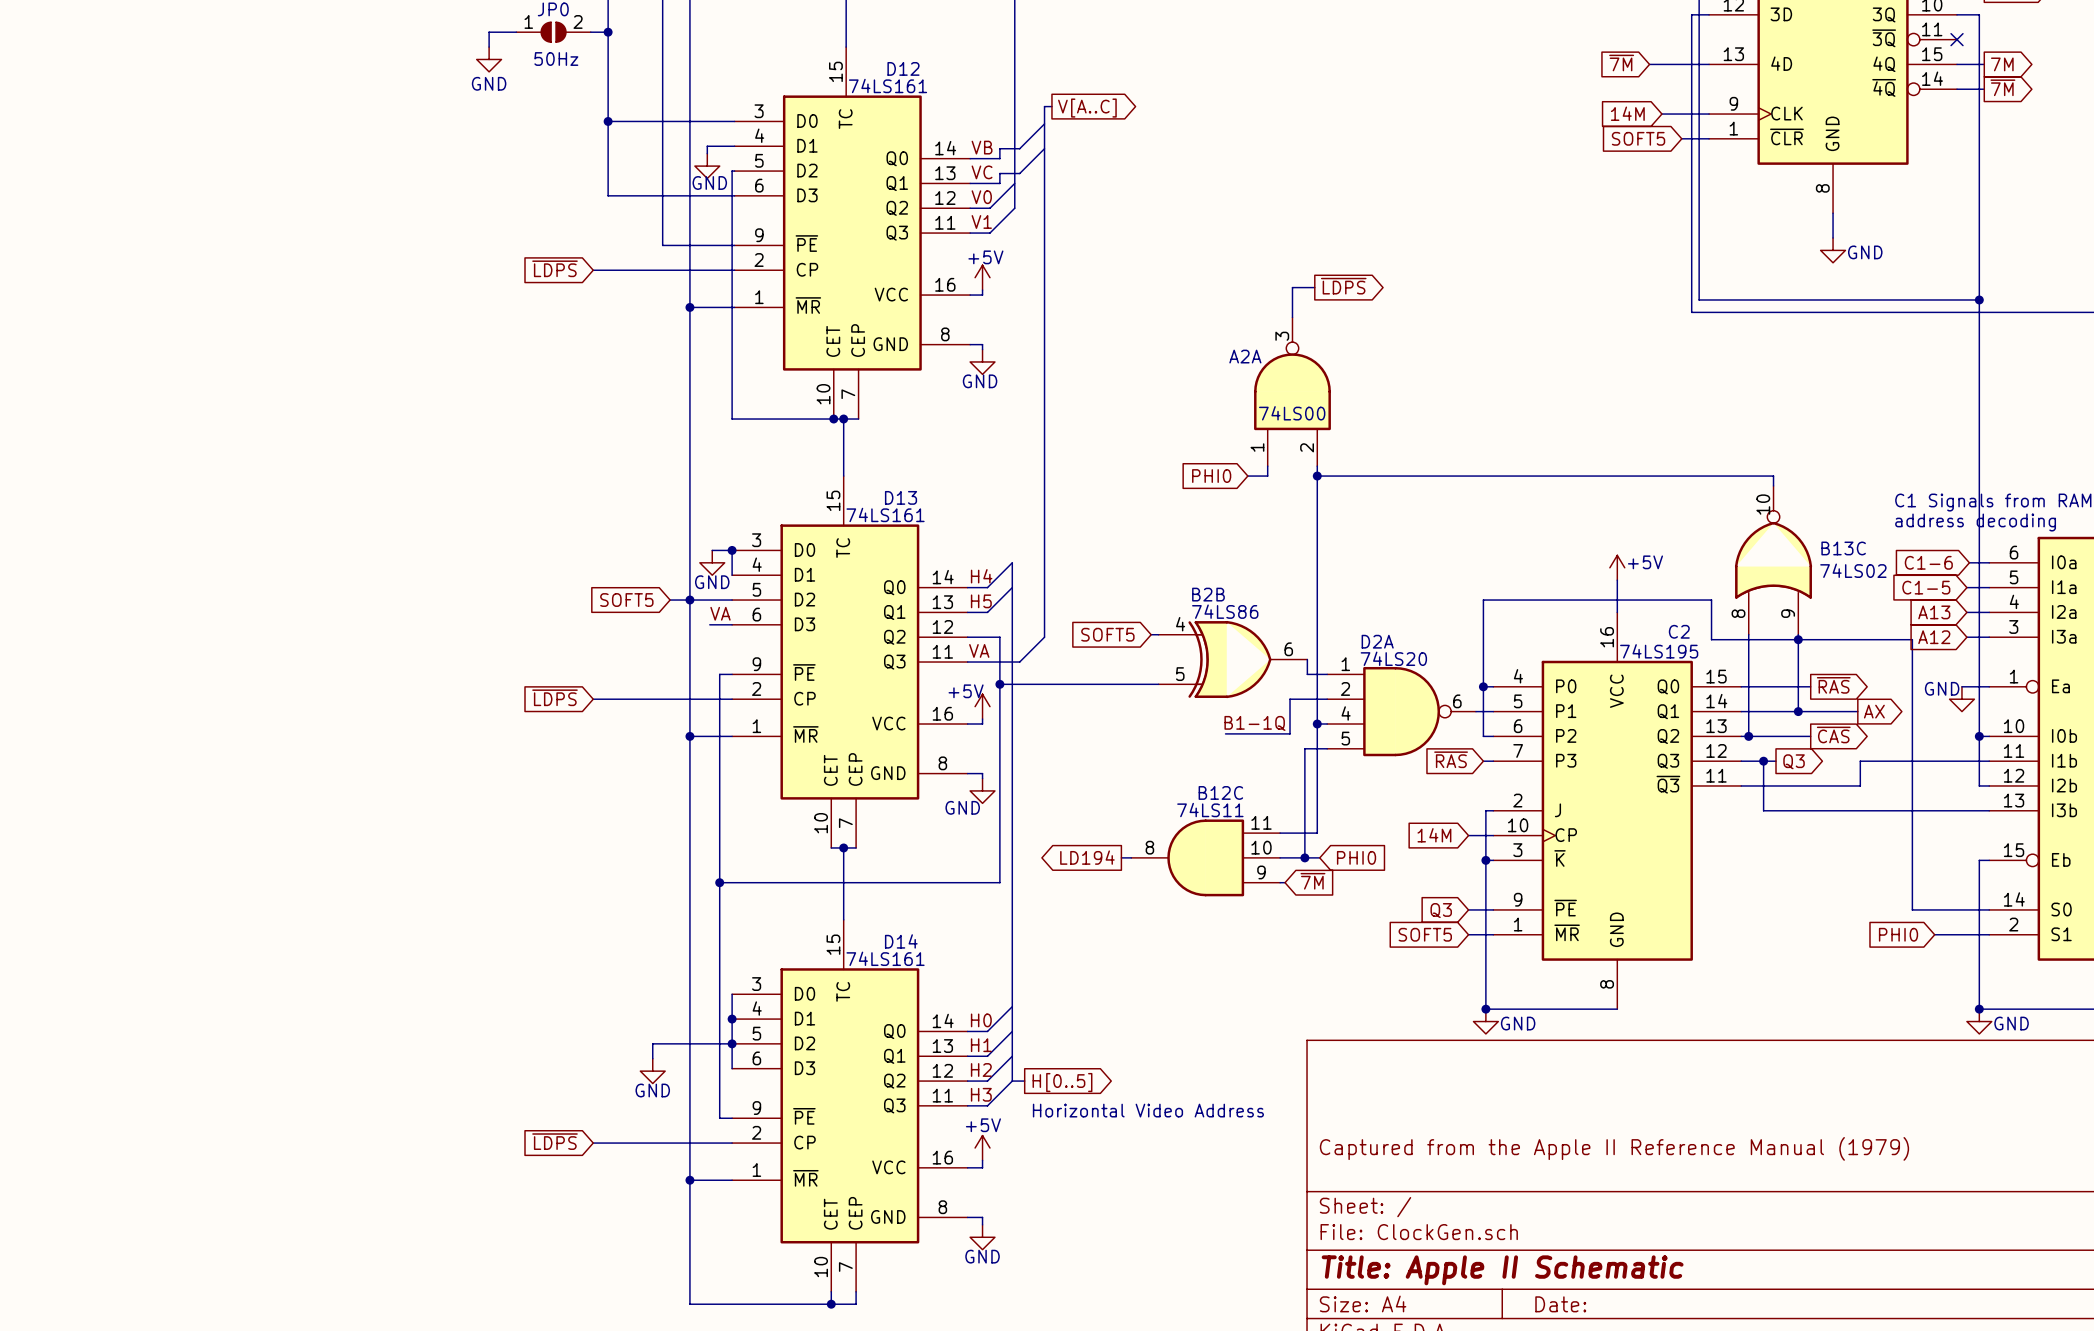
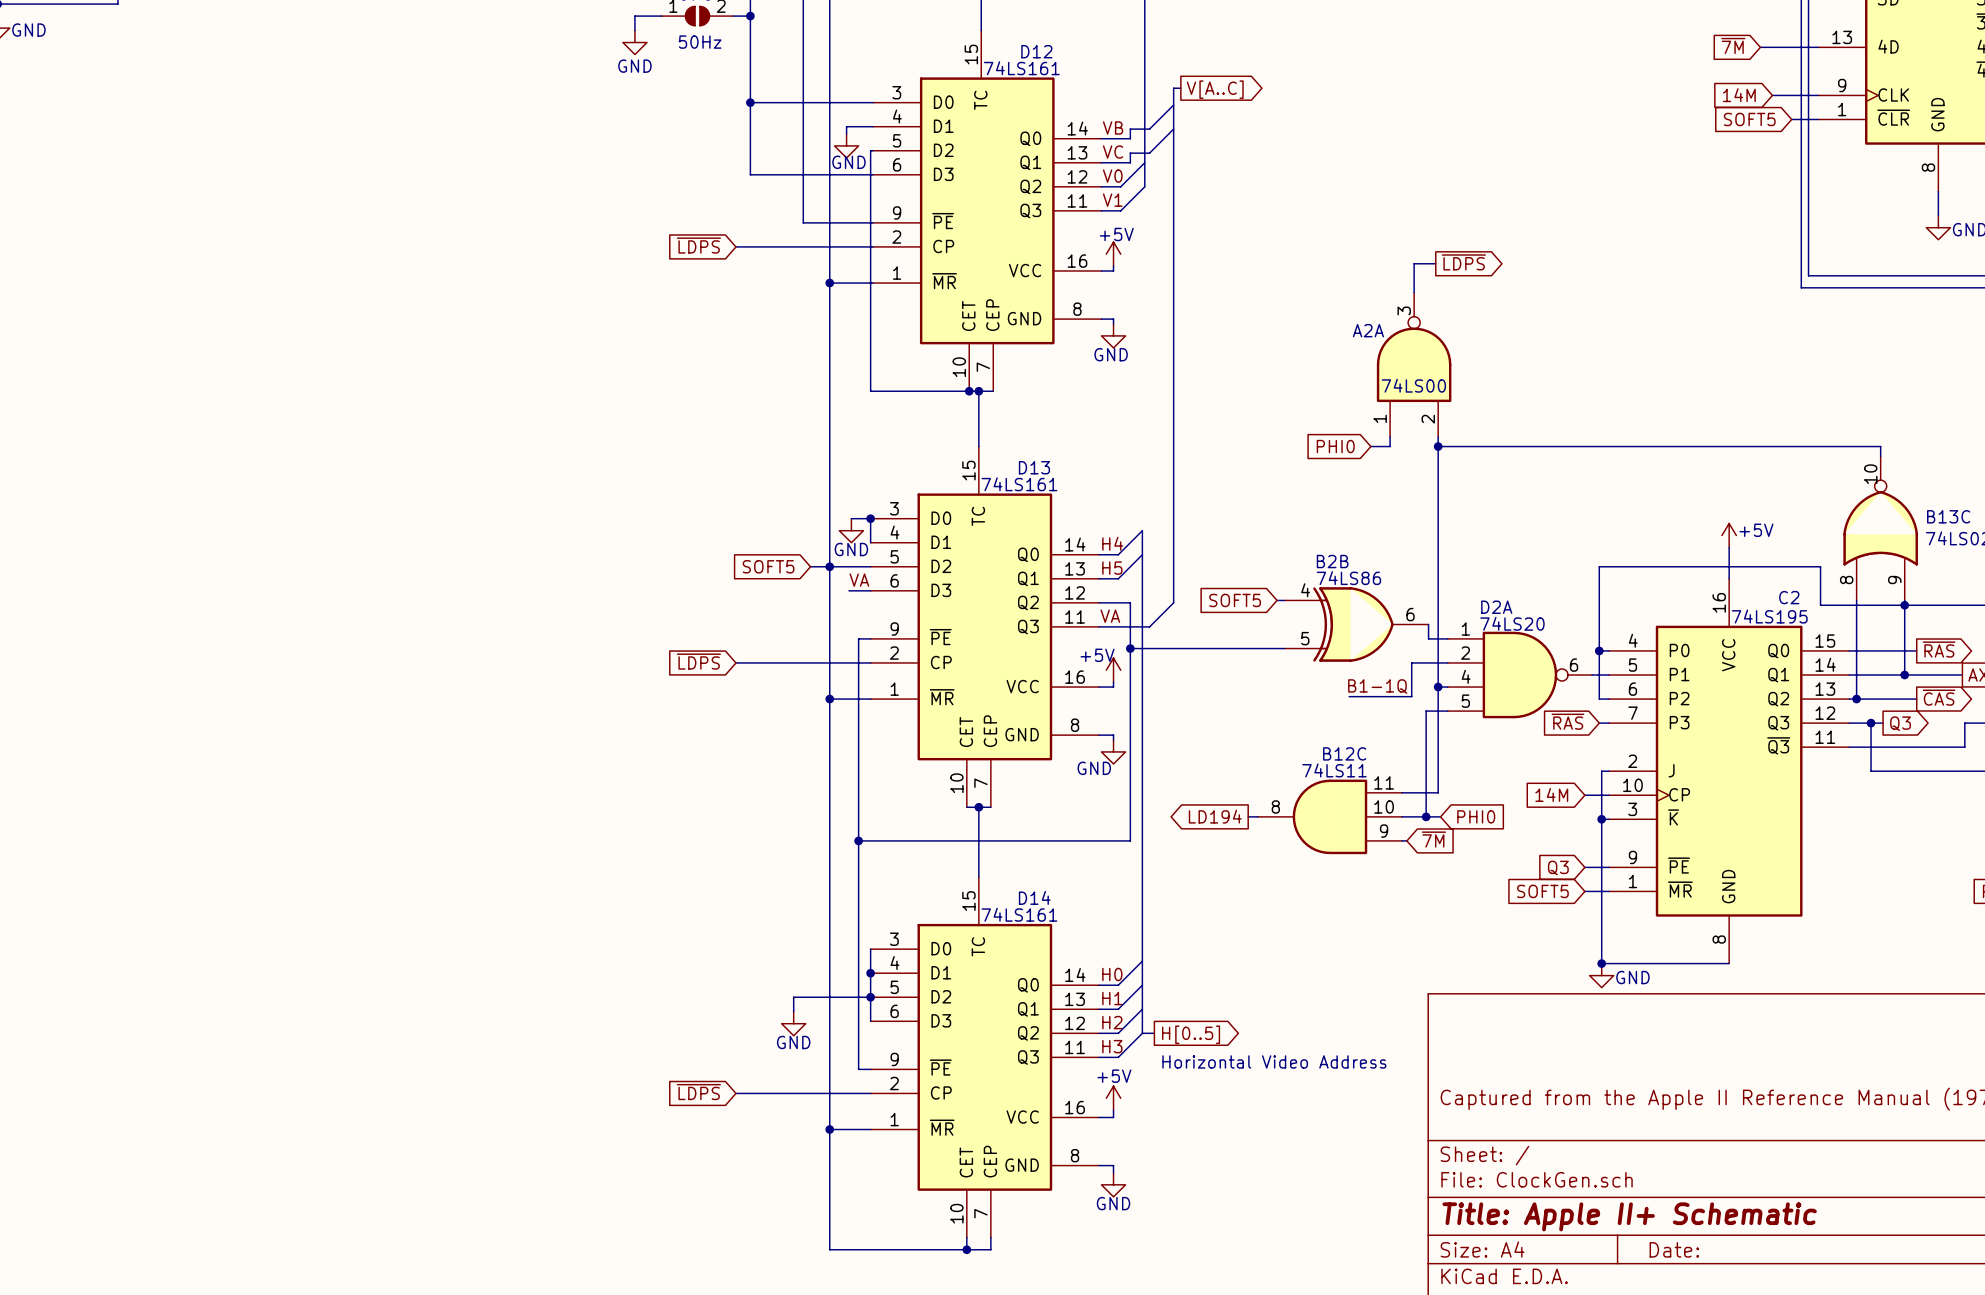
title block: Title: Apple II Schematic (1502, 1270) -> Title: Apple II+ Schematic (1629, 1216)

